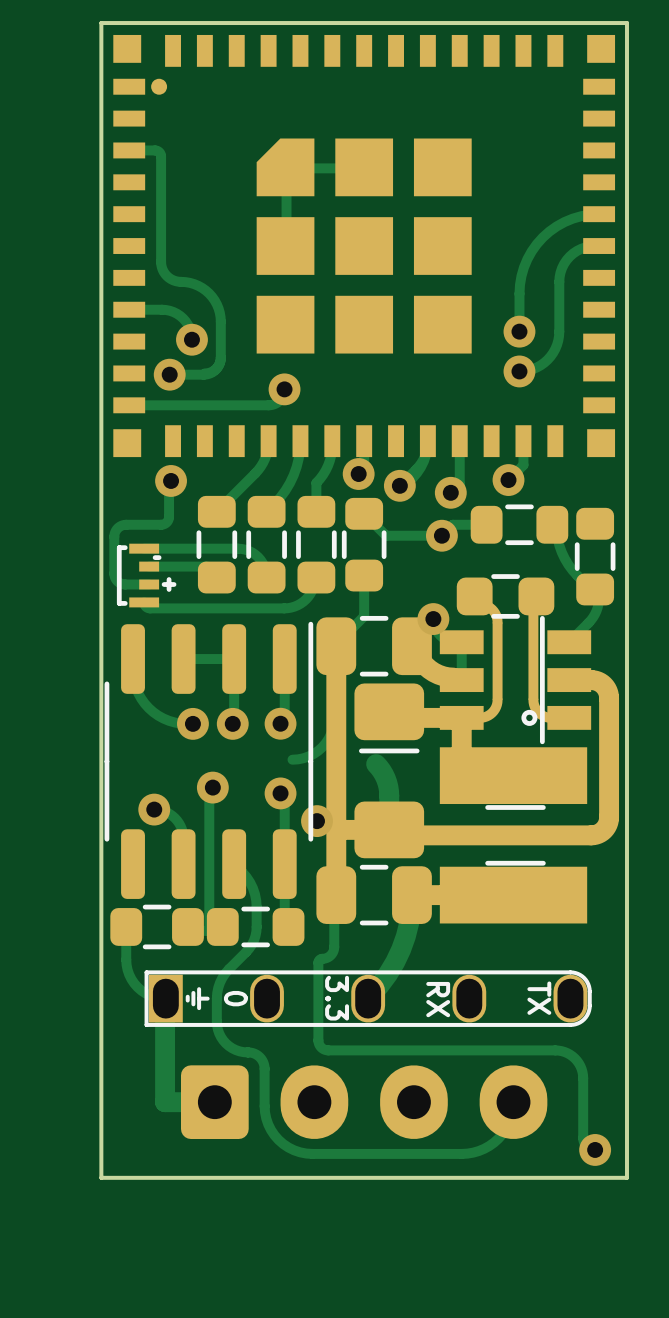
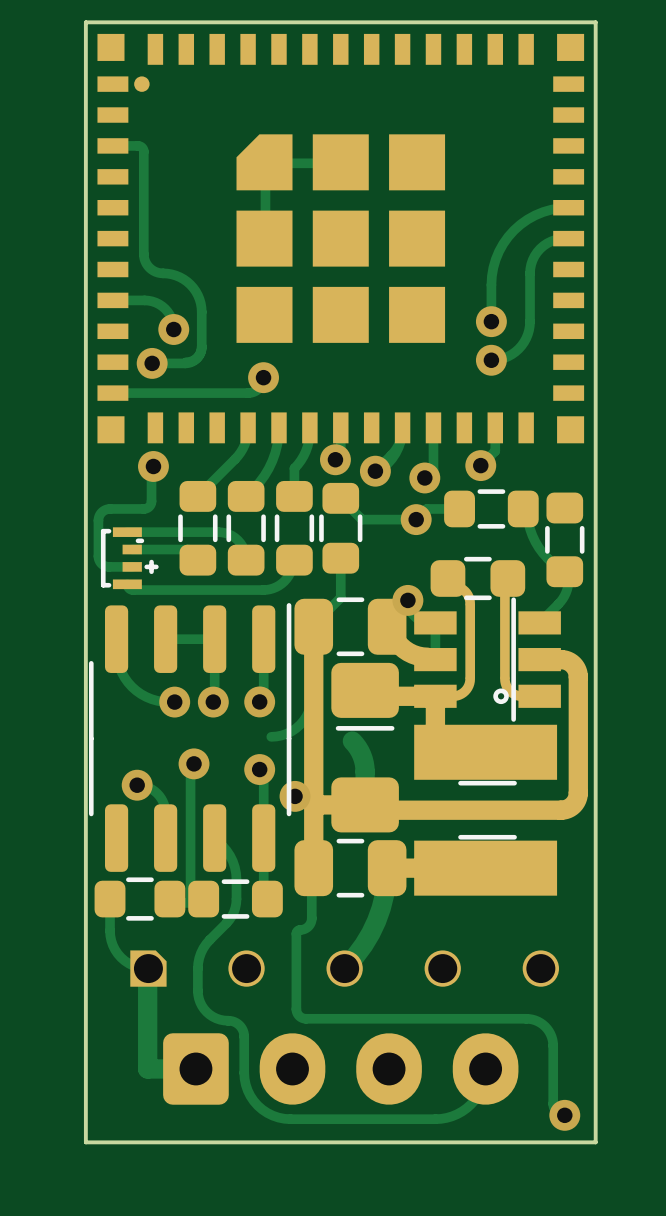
part footprint: [144, 970, 592, 1027] -> [130, 950, 559, 987]

